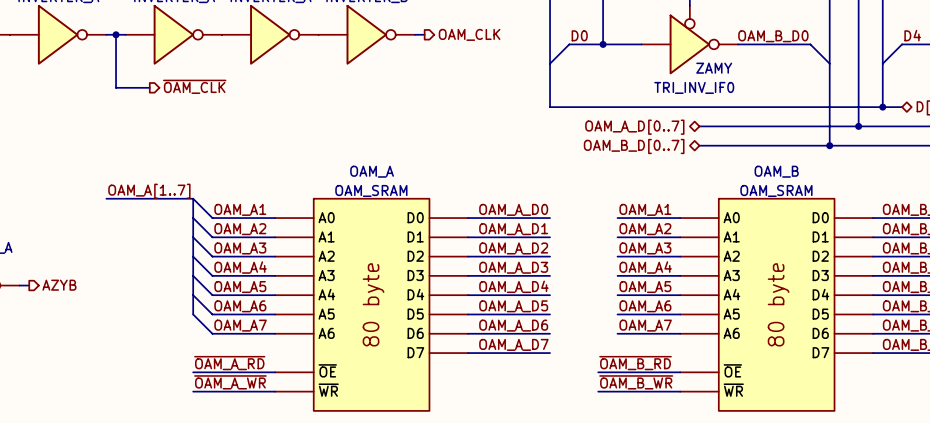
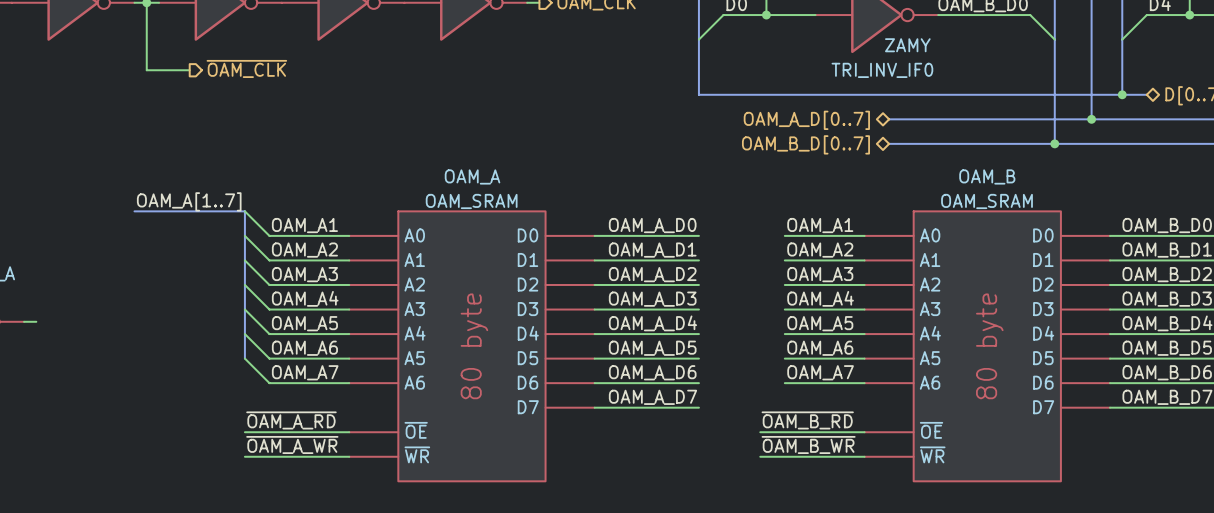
hierarchical label: AZYB (59, 285) -> none

